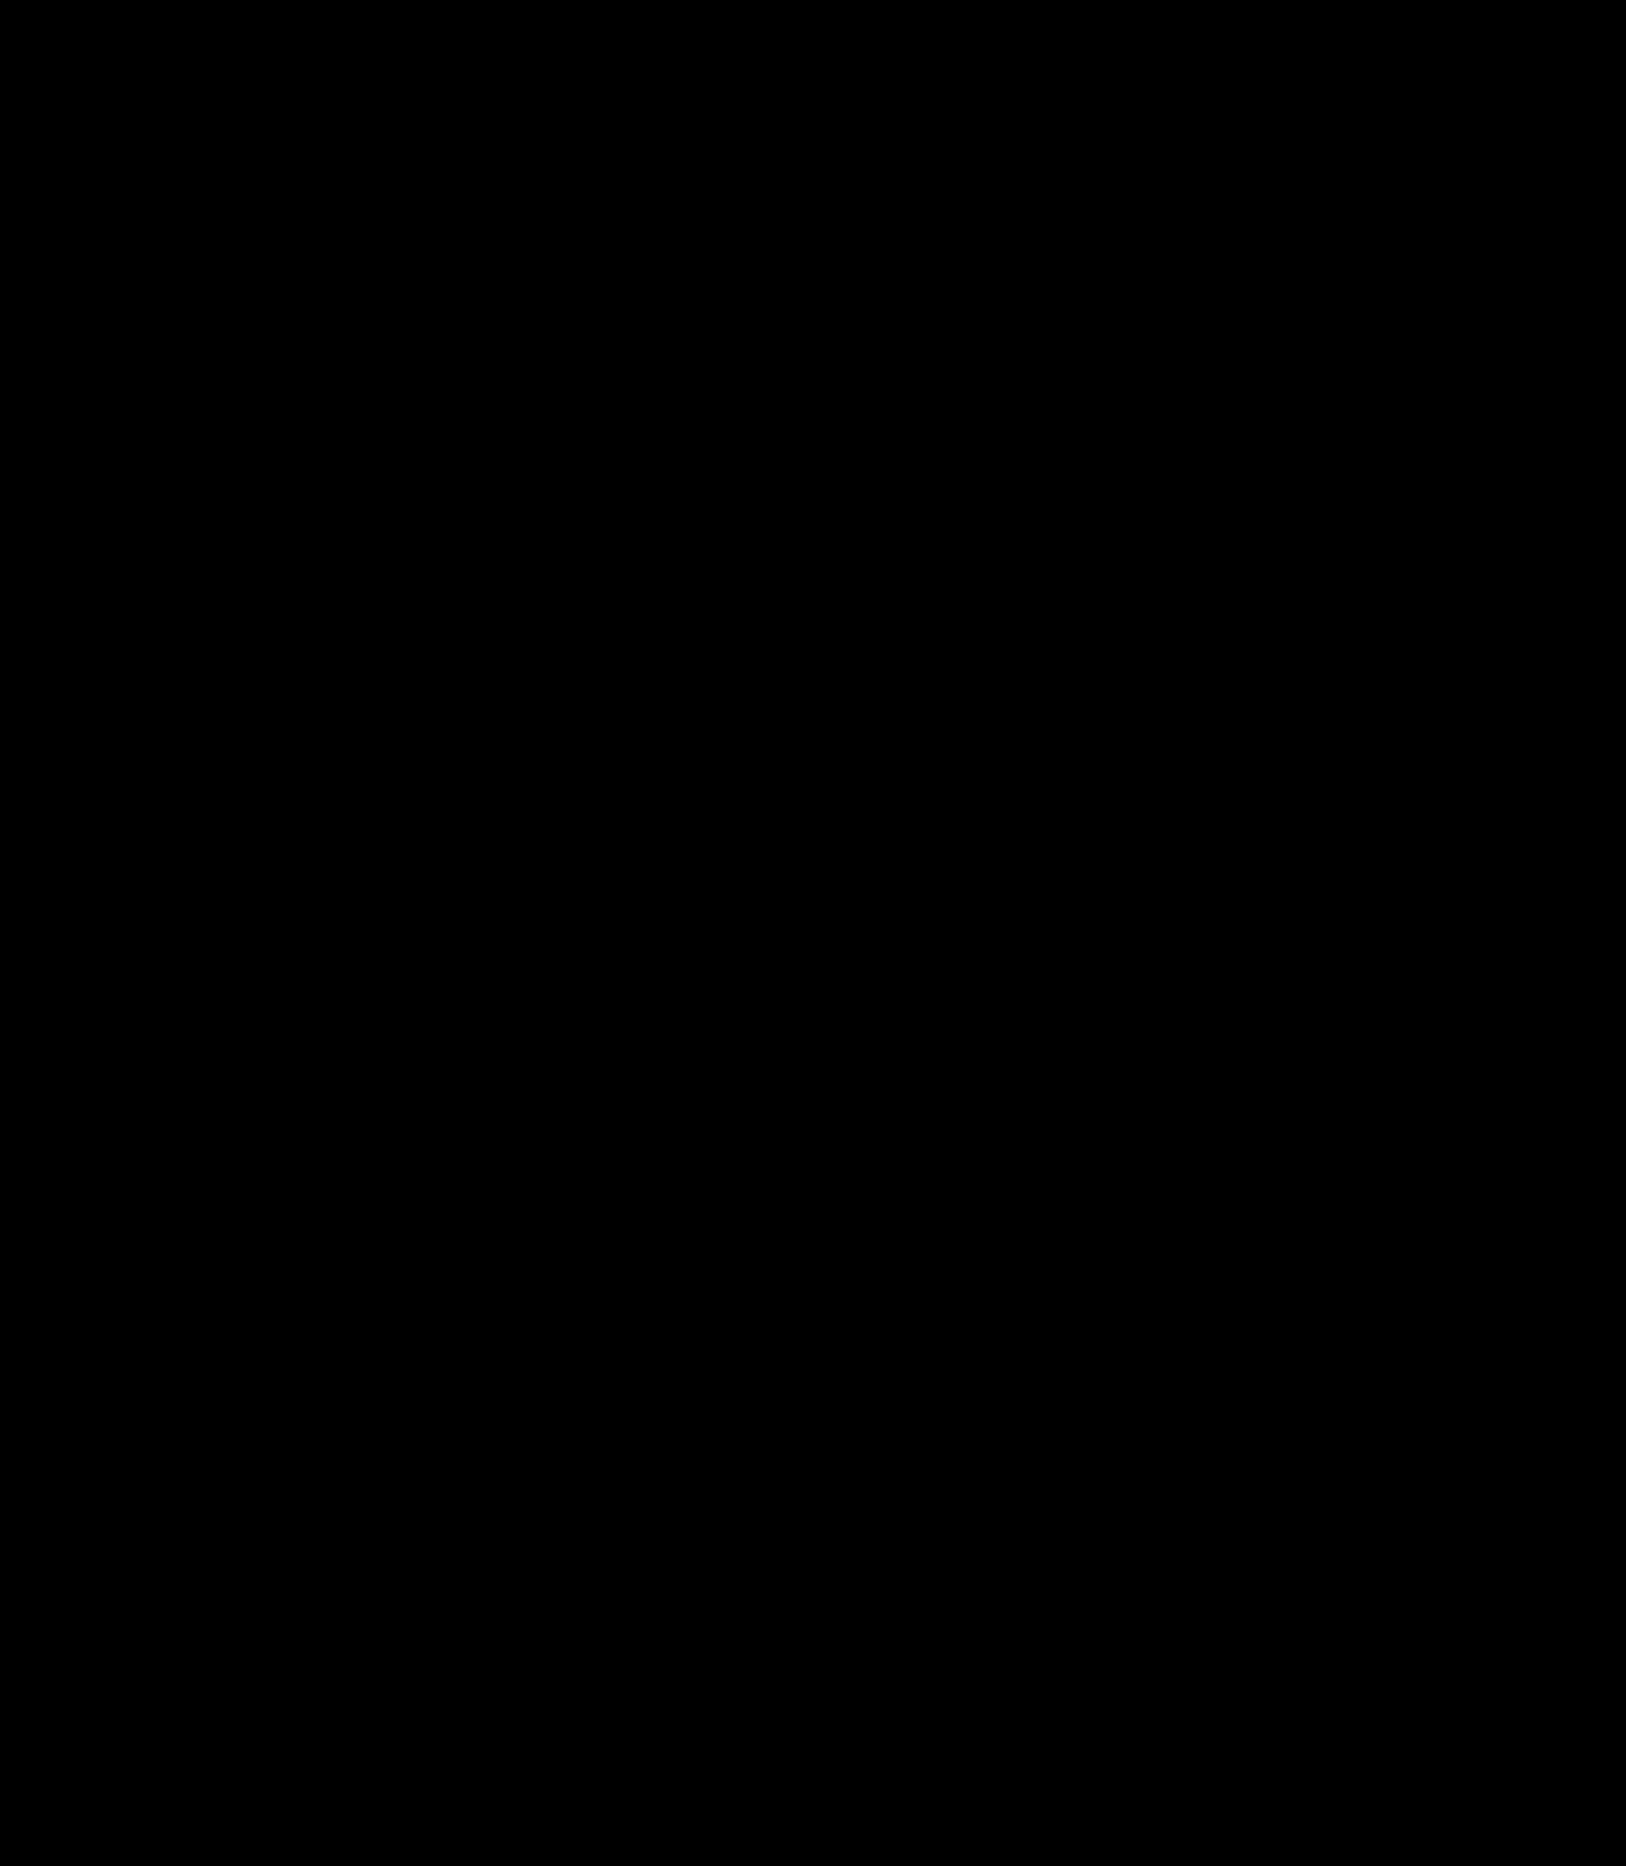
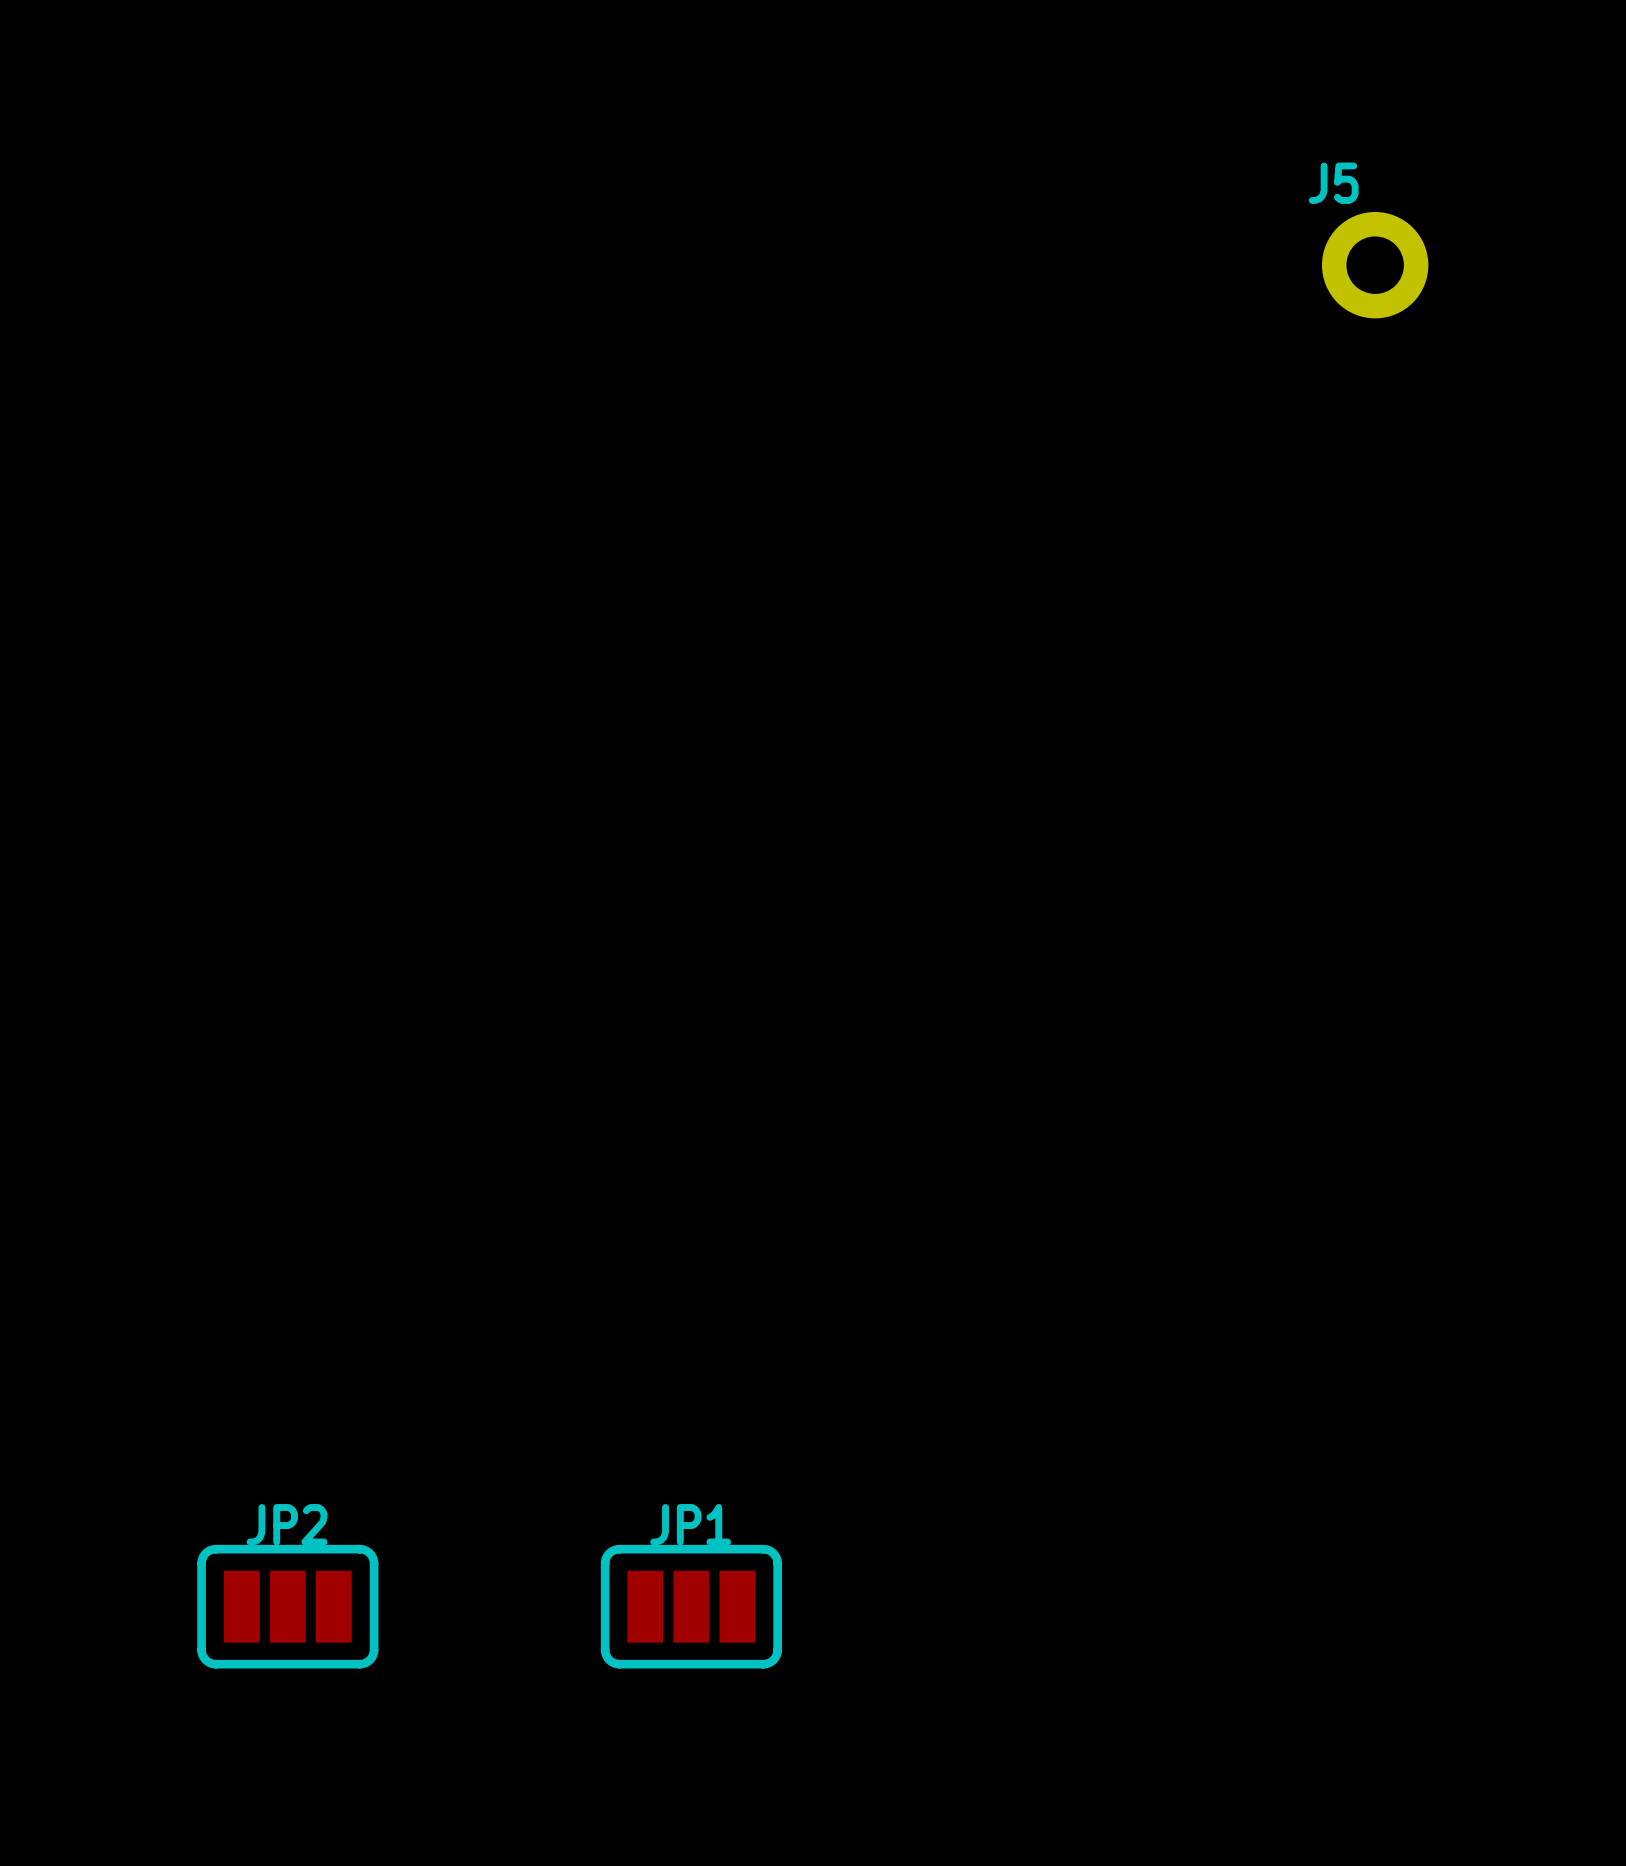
J5: none -> (1375, 265)
JP2: none -> (287, 1606)
JP1: none -> (691, 1606)

